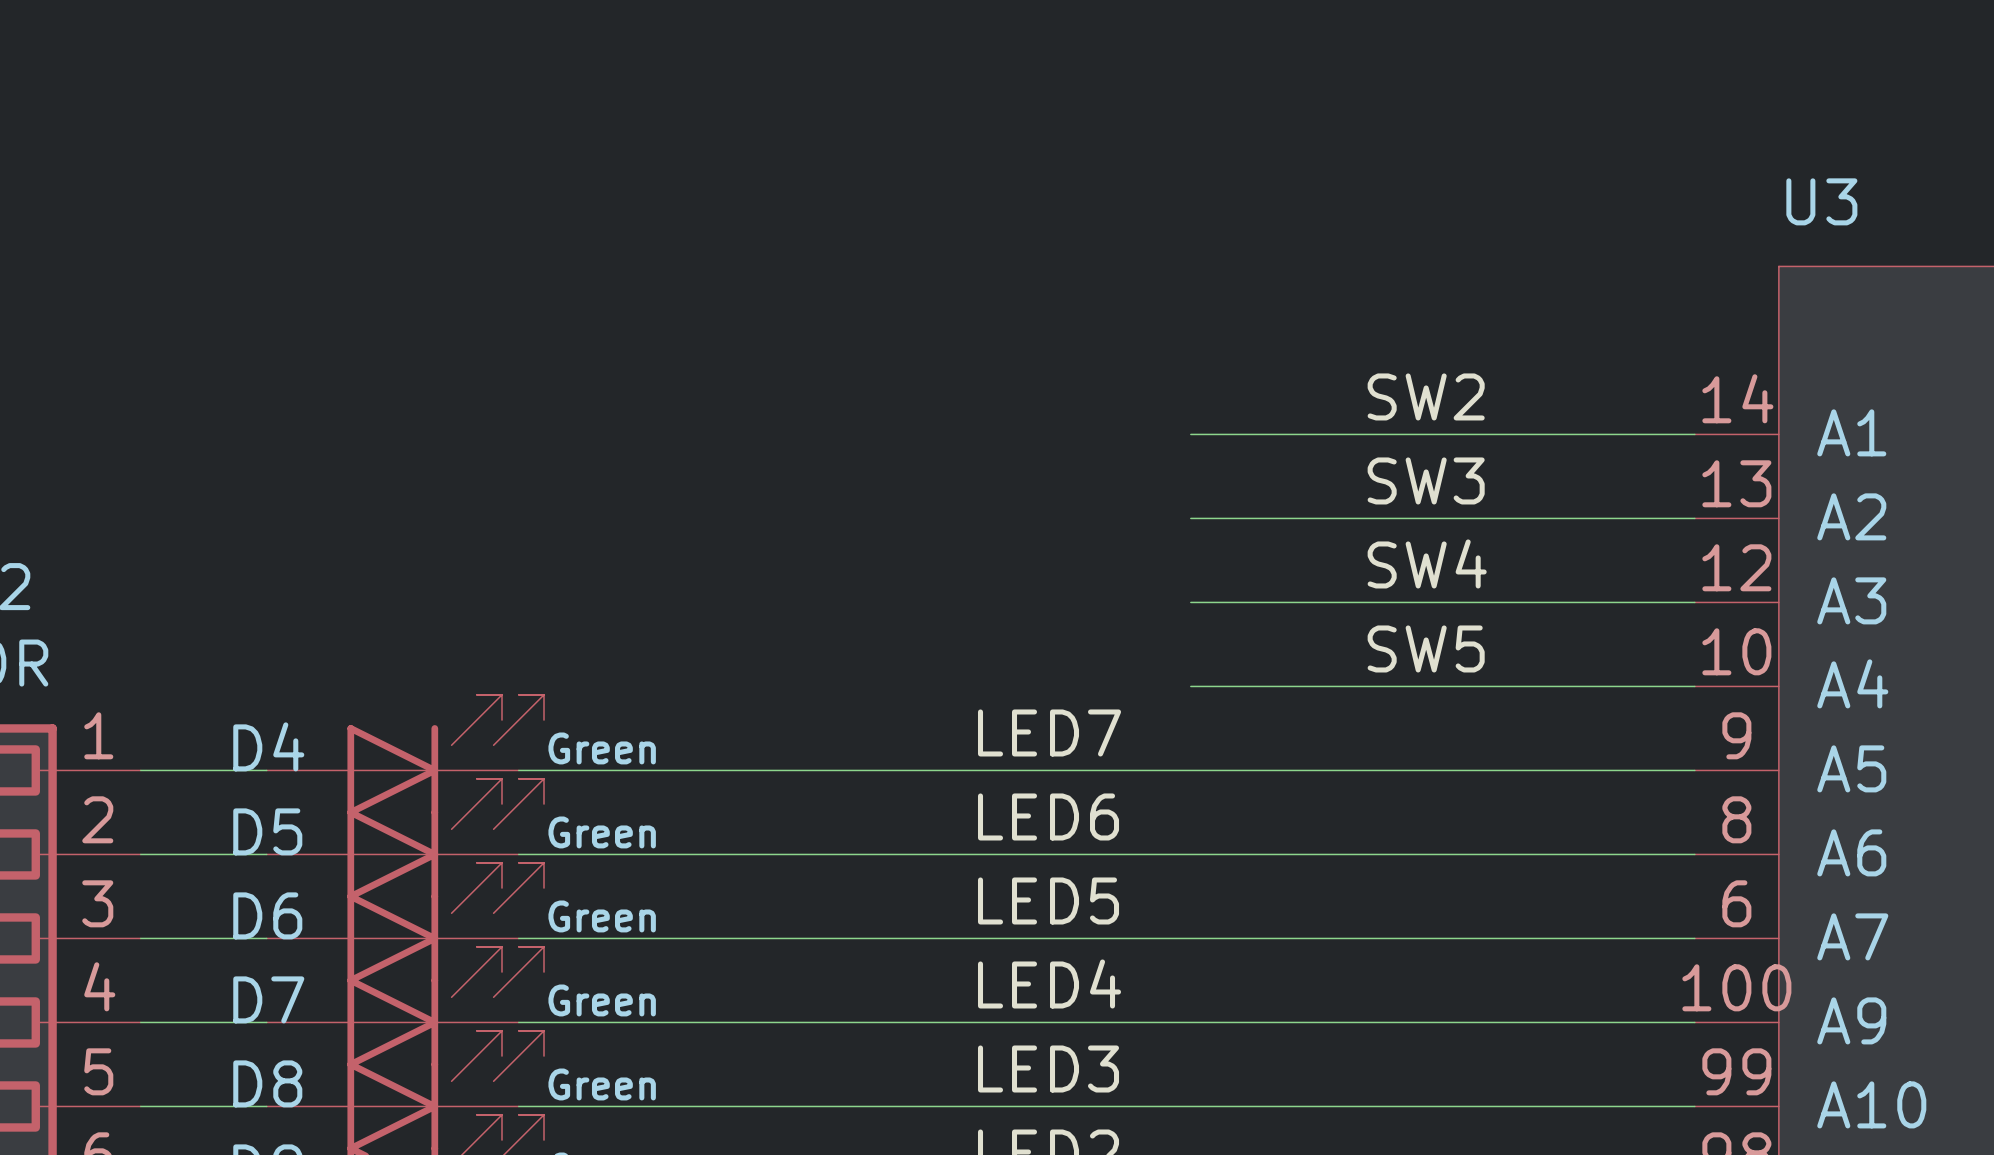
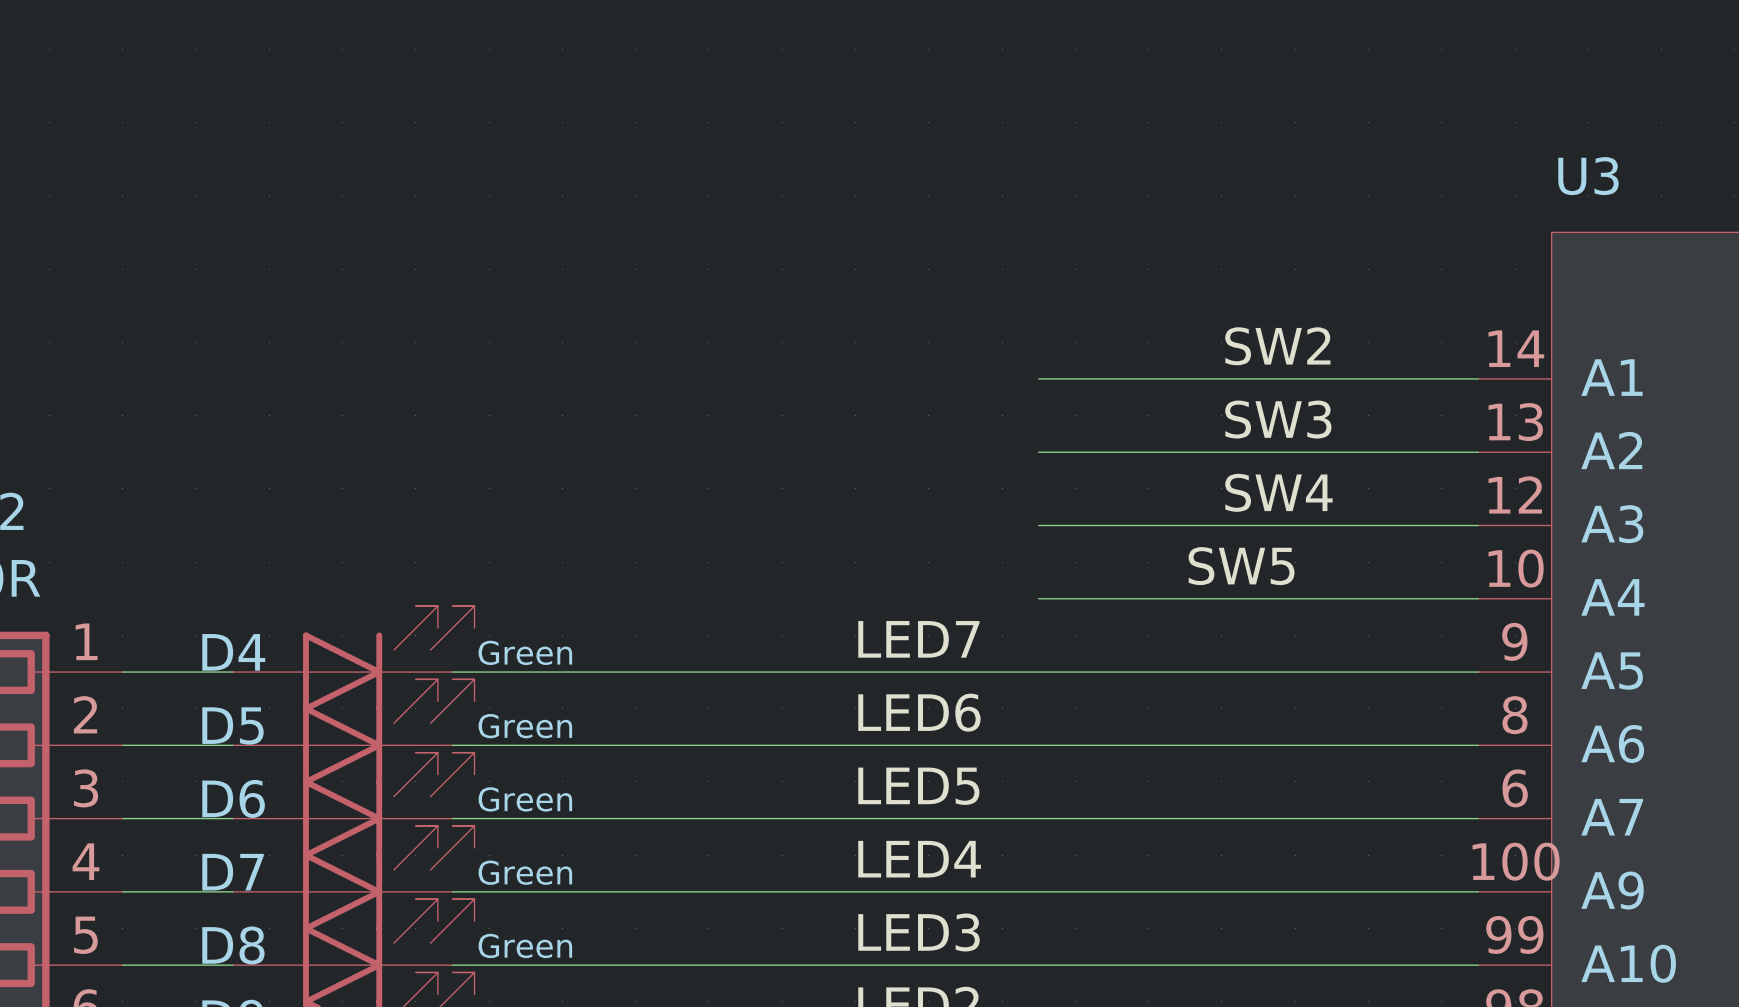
label position: SW2 (1426, 396) -> SW2 (1277, 346)
label position: SW3 (1426, 480) -> SW3 (1278, 419)
label position: SW4 (1427, 563) -> SW4 (1278, 492)

